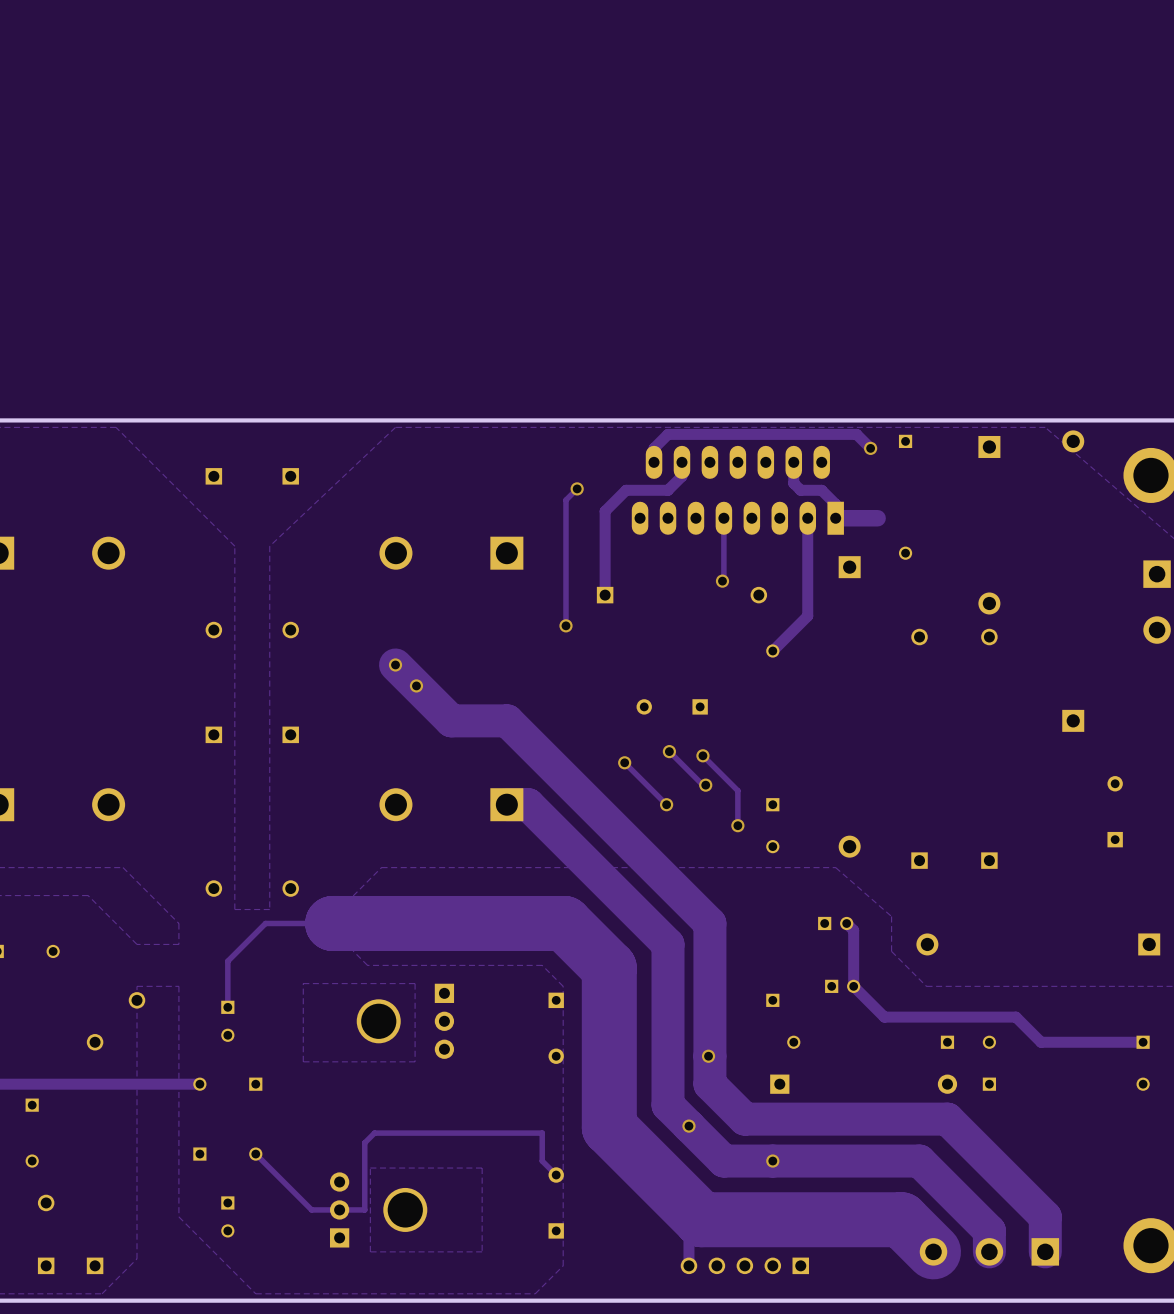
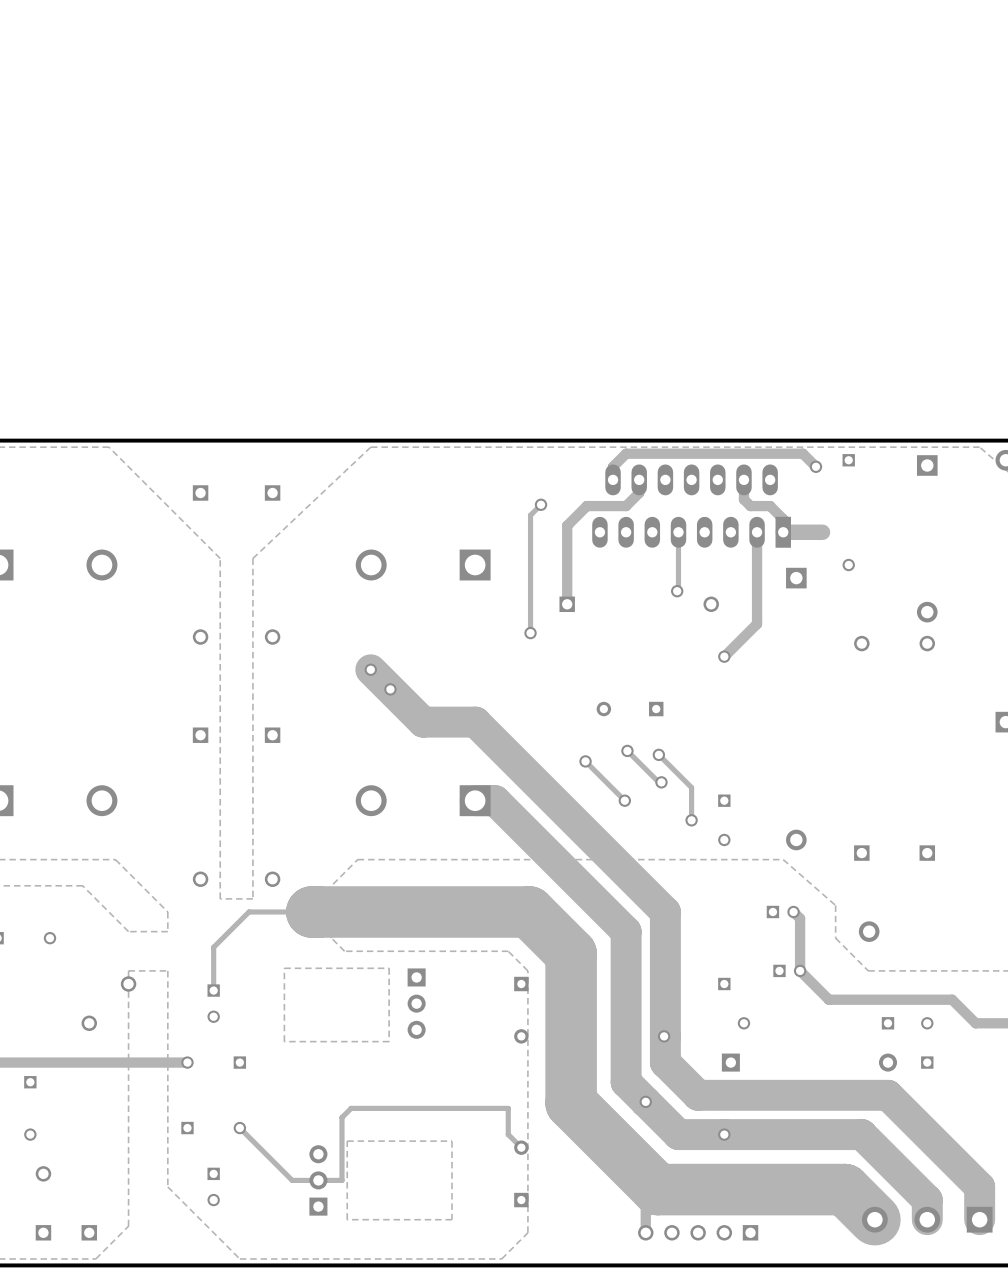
part: (378, 1021) -> none
part: (405, 1209) -> none

